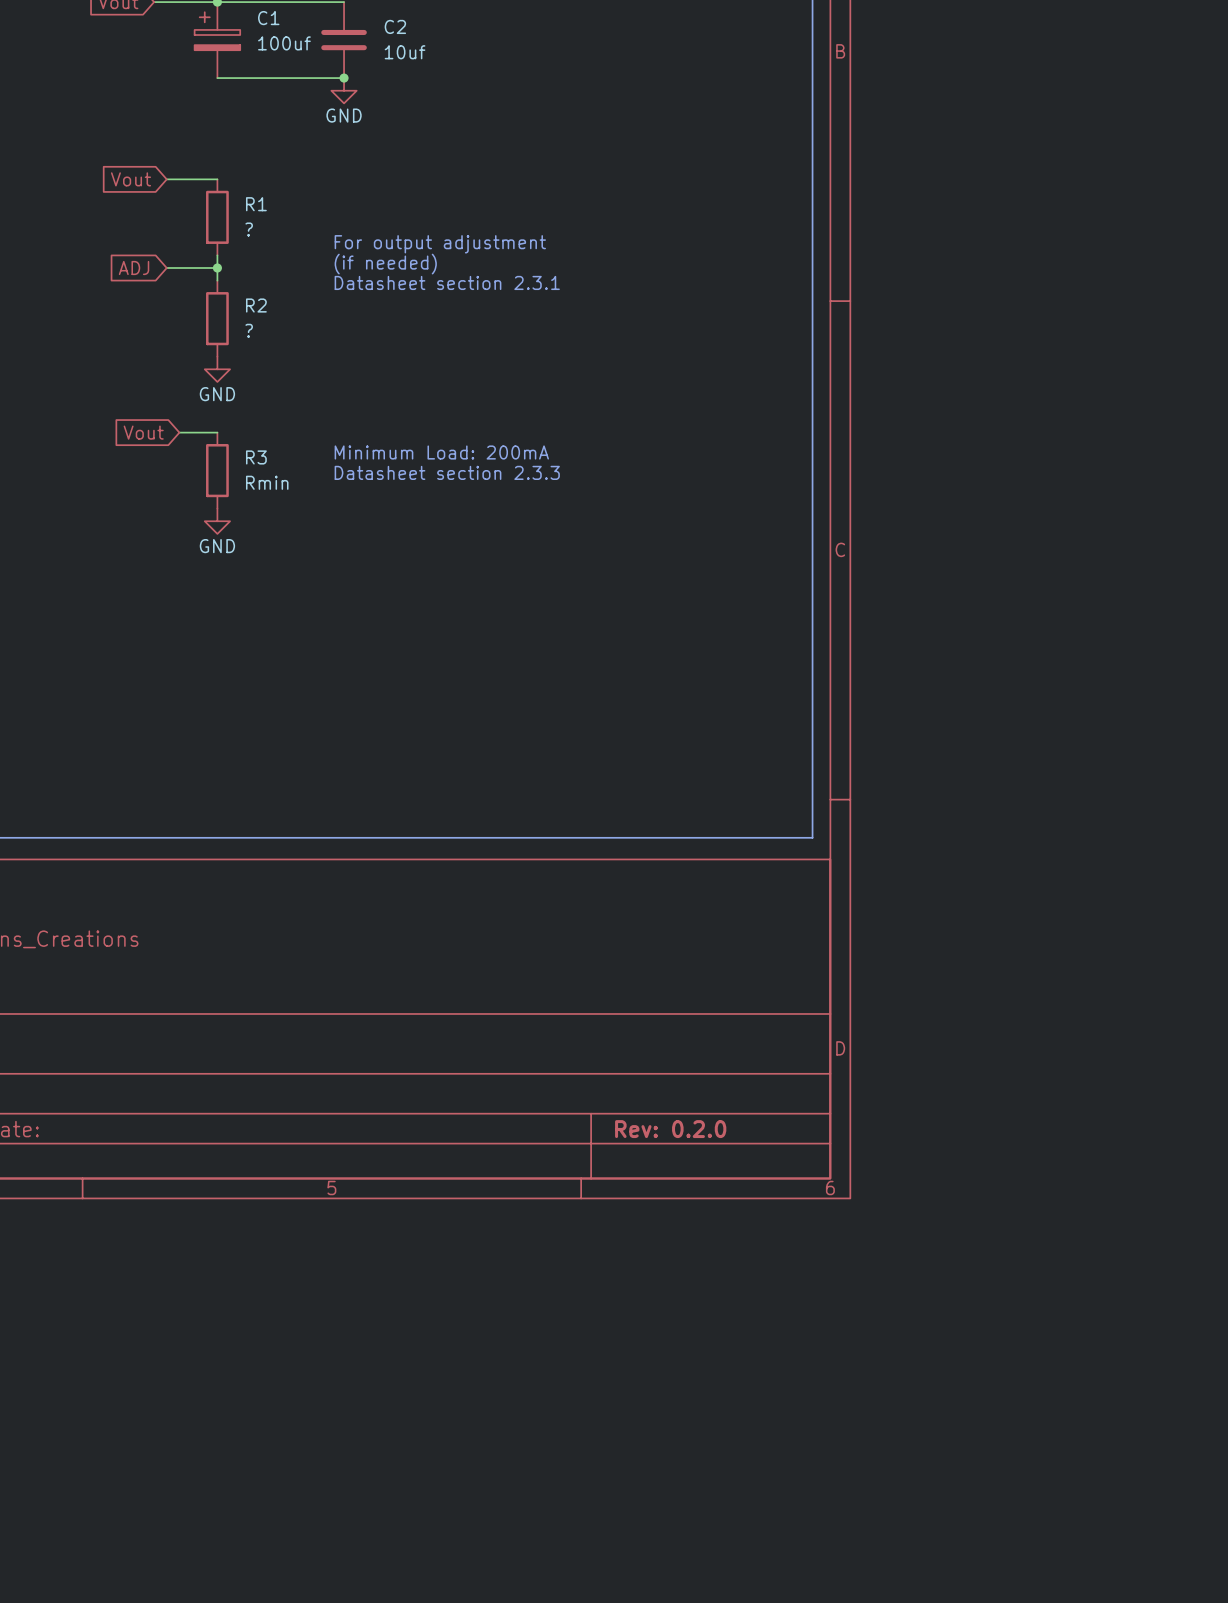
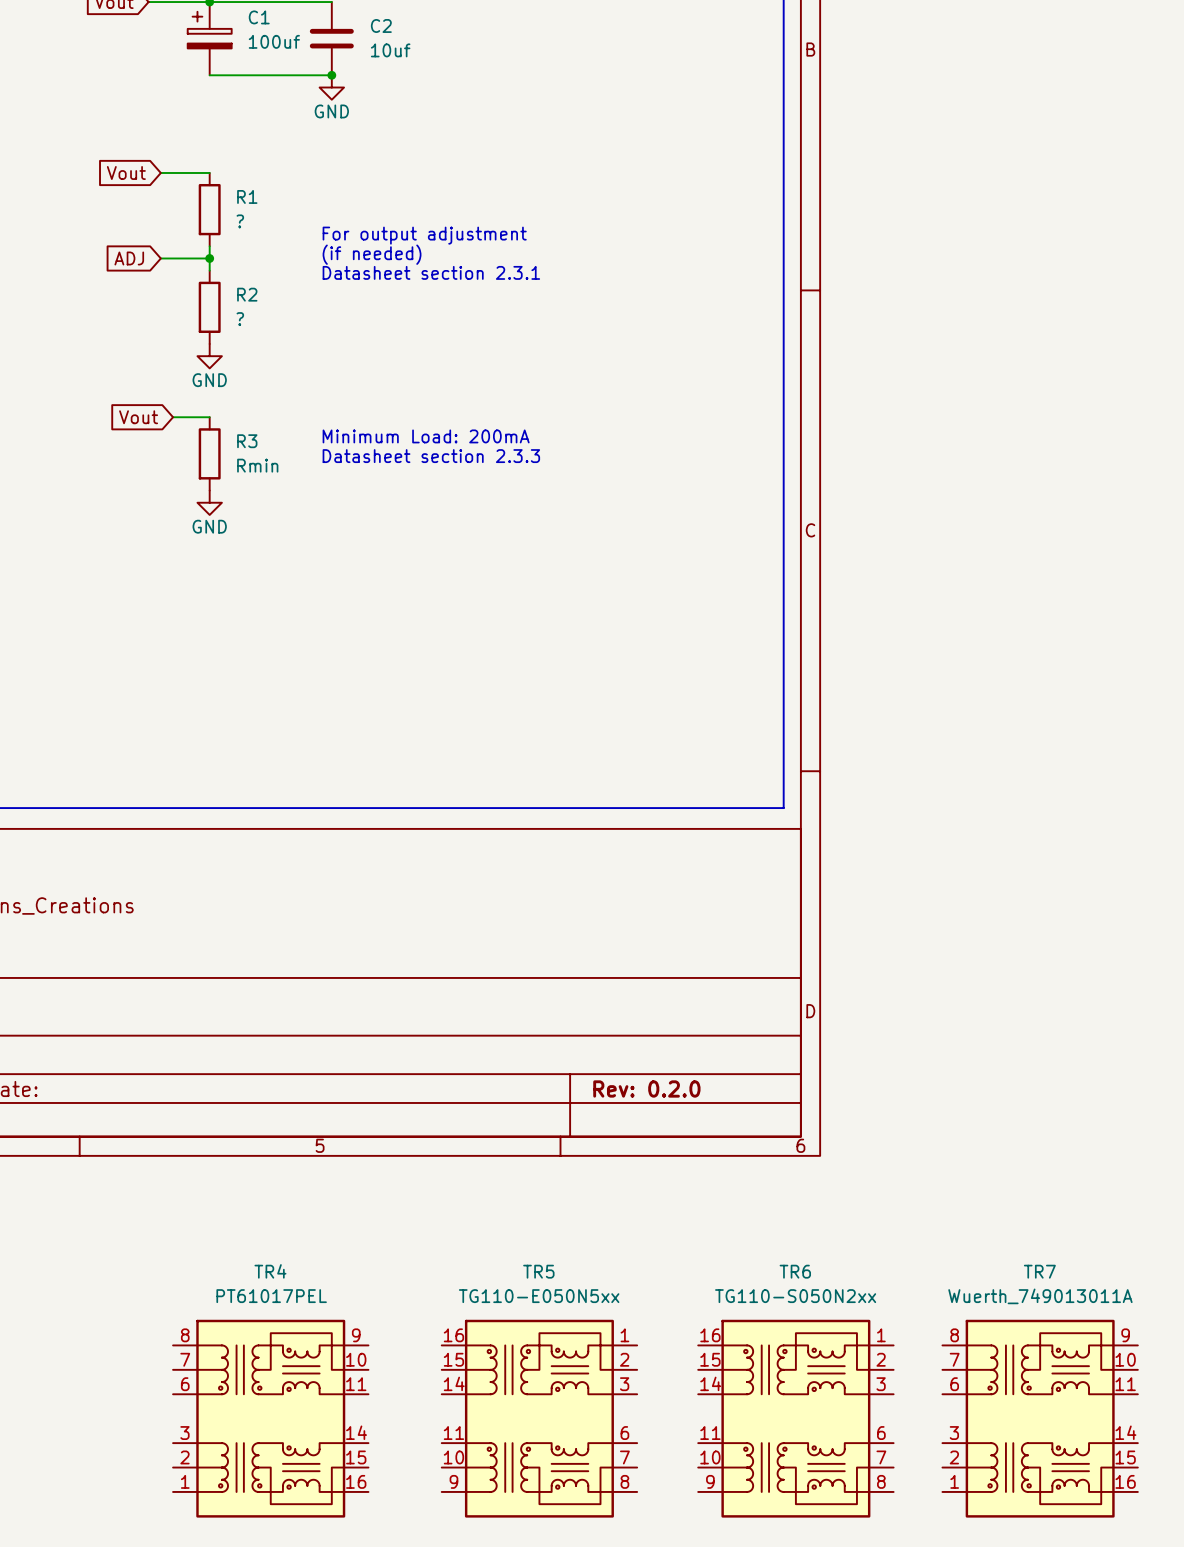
TR4: none -> PT61017PEL (270, 1418)
TR5: none -> TG110-E050N5xx (539, 1418)
TR6: none -> TG110-S050N2xx (795, 1418)
TR7: none -> Wuerth_749013011A (1040, 1418)

